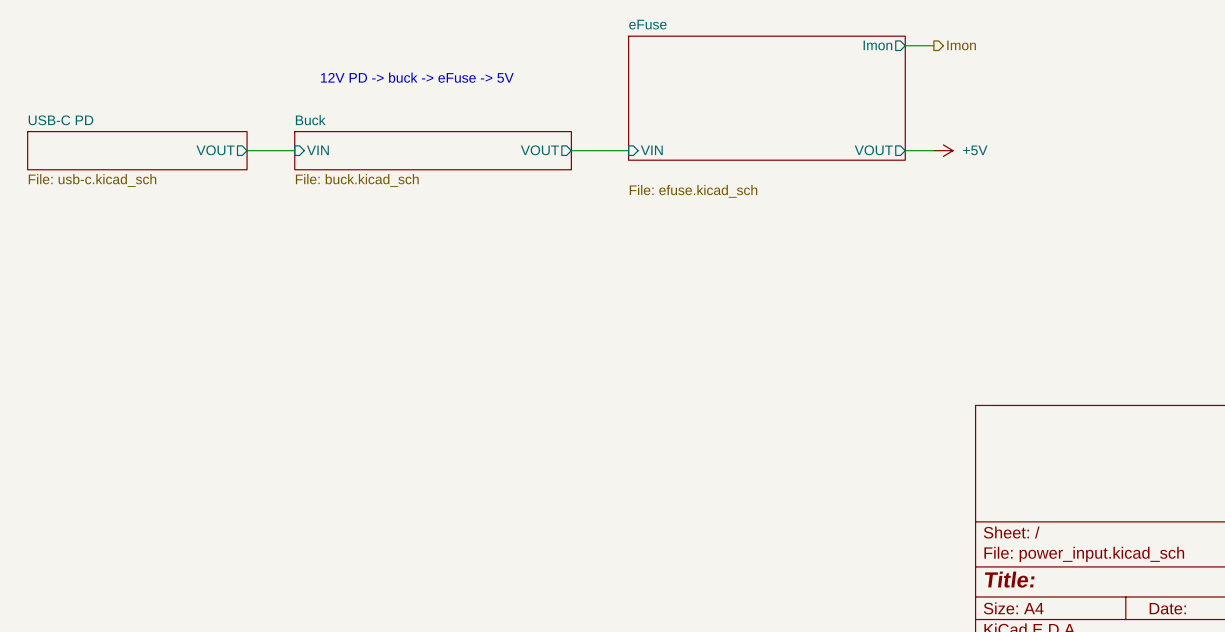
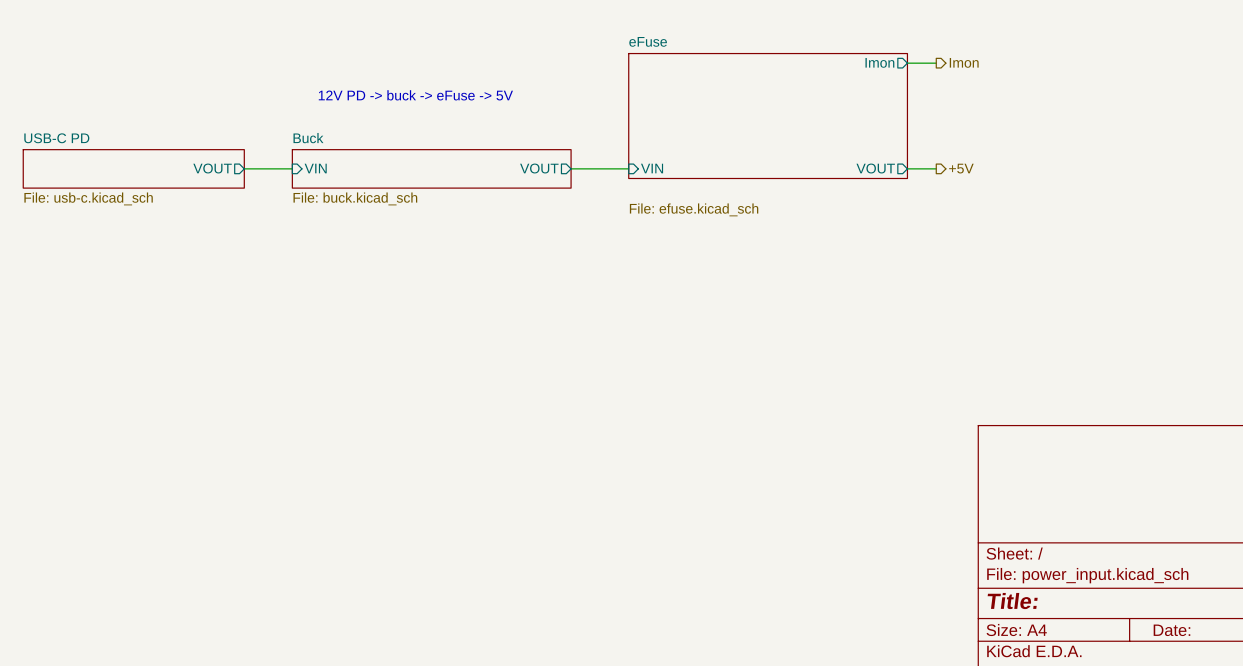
power symbol: +5V (943, 150) -> none
hierarchical label: none -> +5V (961, 168)

